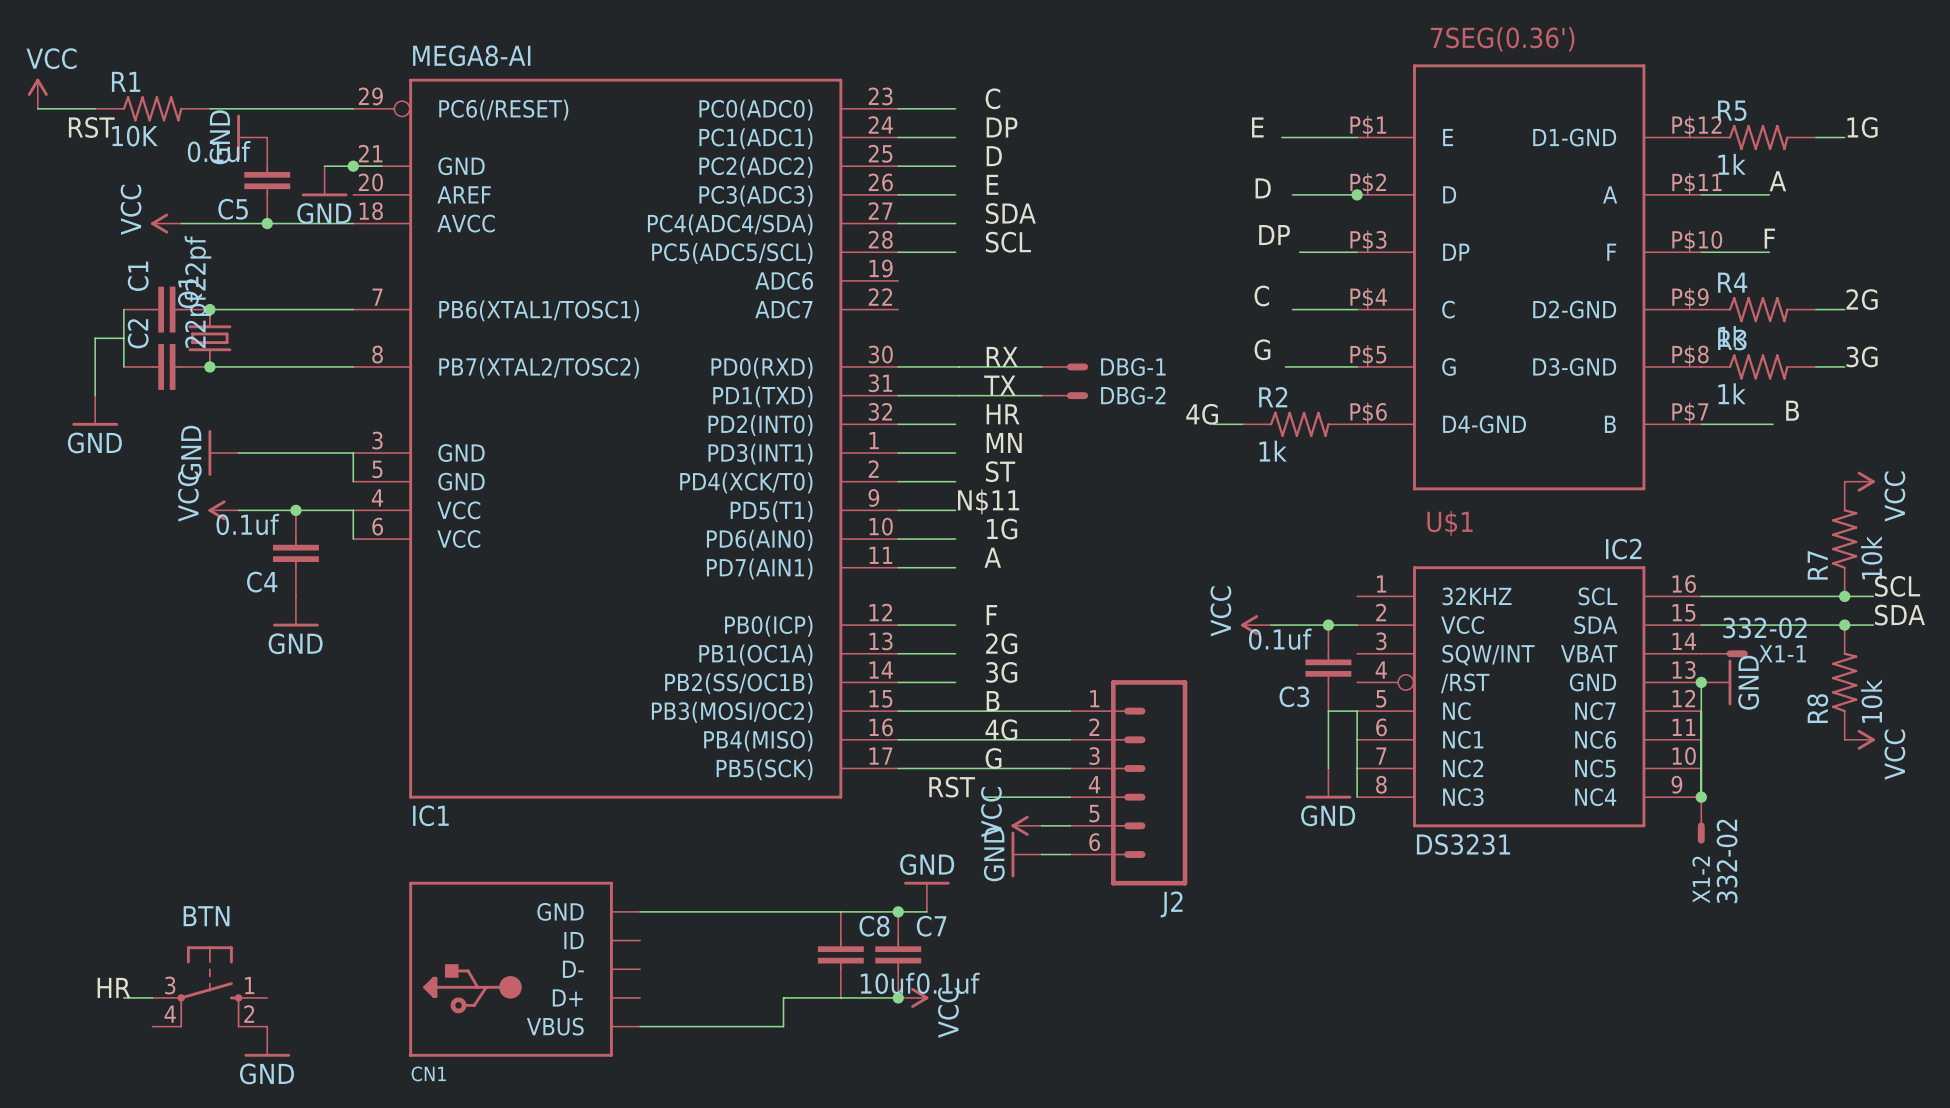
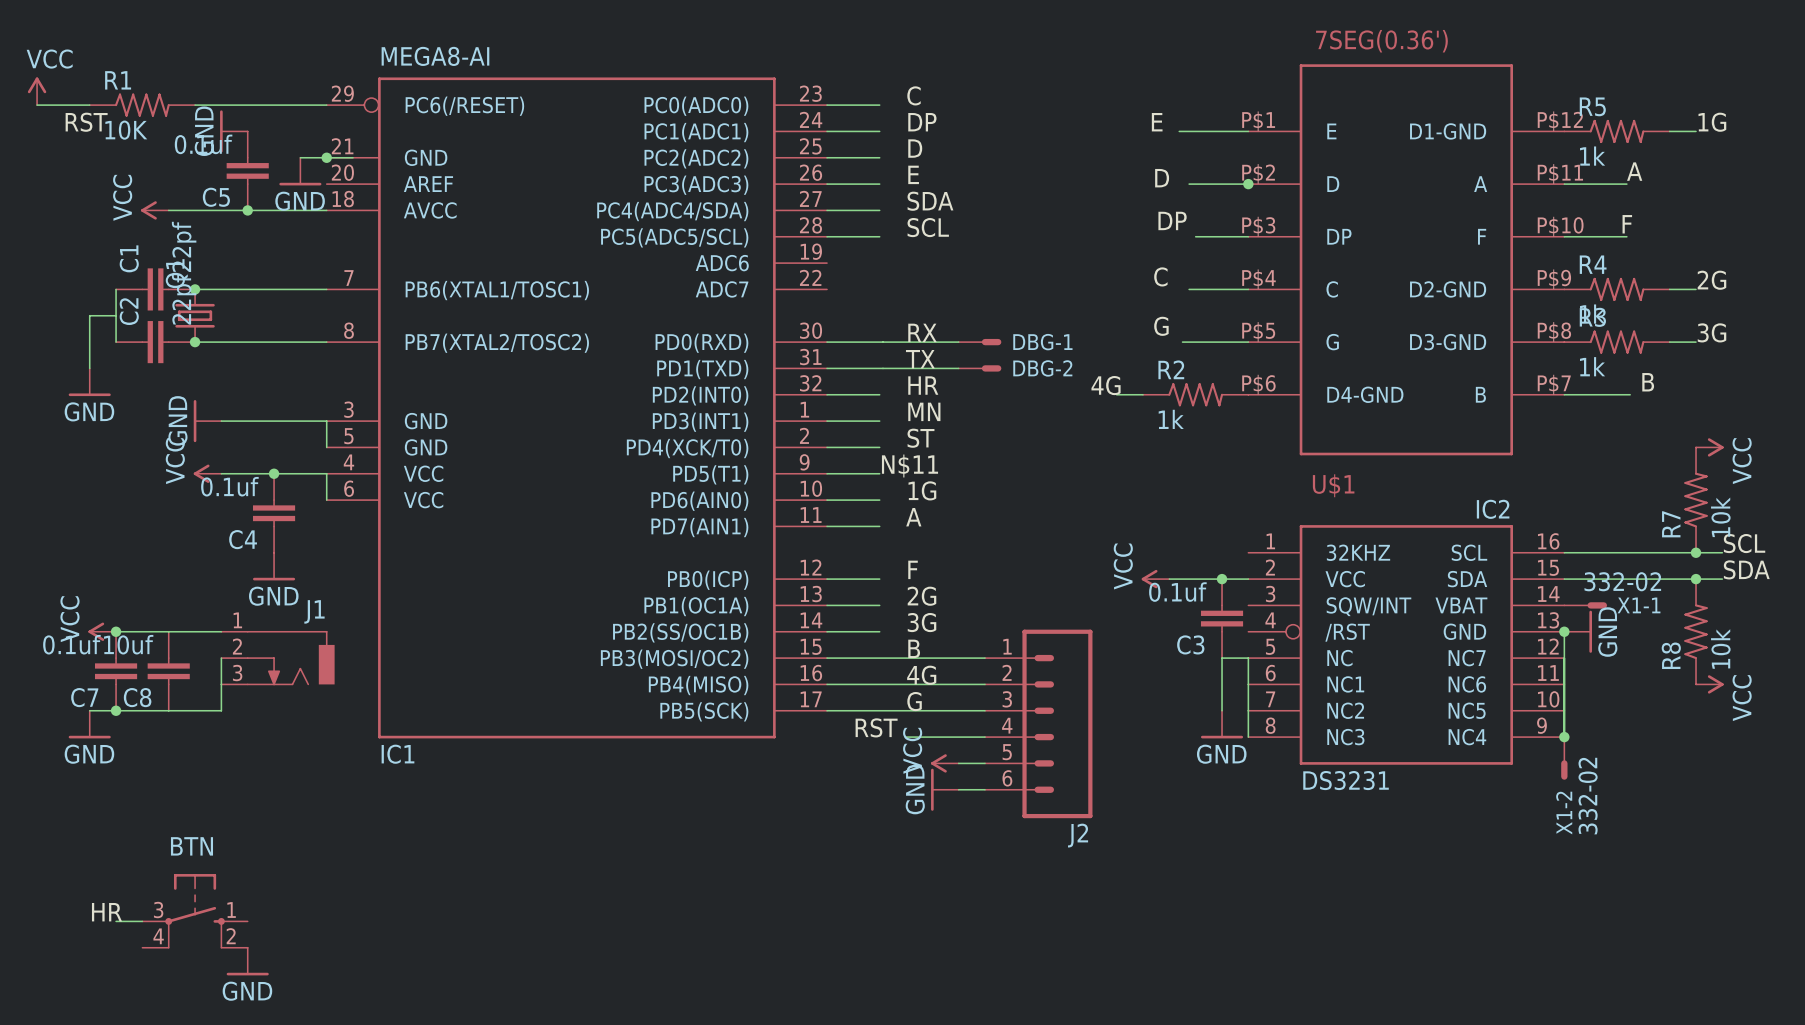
power symbol: none -> VCC (102, 631)
wire: none -> (116, 631) (221, 631)
junction: none -> (116, 631)
wire: none -> (221, 658) (221, 710) (89, 710)
J1: none -> (278, 658)
junction: none -> (116, 710)
power symbol: none -> GND (89, 724)
power symbol: GND (926, 896) -> none
wire: (640, 911) (926, 911) -> none
junction: (898, 911) -> none
C8 name position: C8 (874, 926) -> C8 (137, 697)
C7 name position: C7 (931, 926) -> C7 (84, 697)
C8 position: (840, 954) -> (168, 671)
C7 position: (898, 954) -> (116, 671)
CN1: (524, 969) -> none
C8 value position: 10uf (887, 983) -> 10uf (128, 644)
C7 value position: 0.1uf (948, 983) -> 0.1uf (71, 644)
wire: (898, 997) (783, 997) (783, 1026) (640, 1026) -> none
junction: (898, 997) -> none
power symbol: VCC (913, 997) -> none

